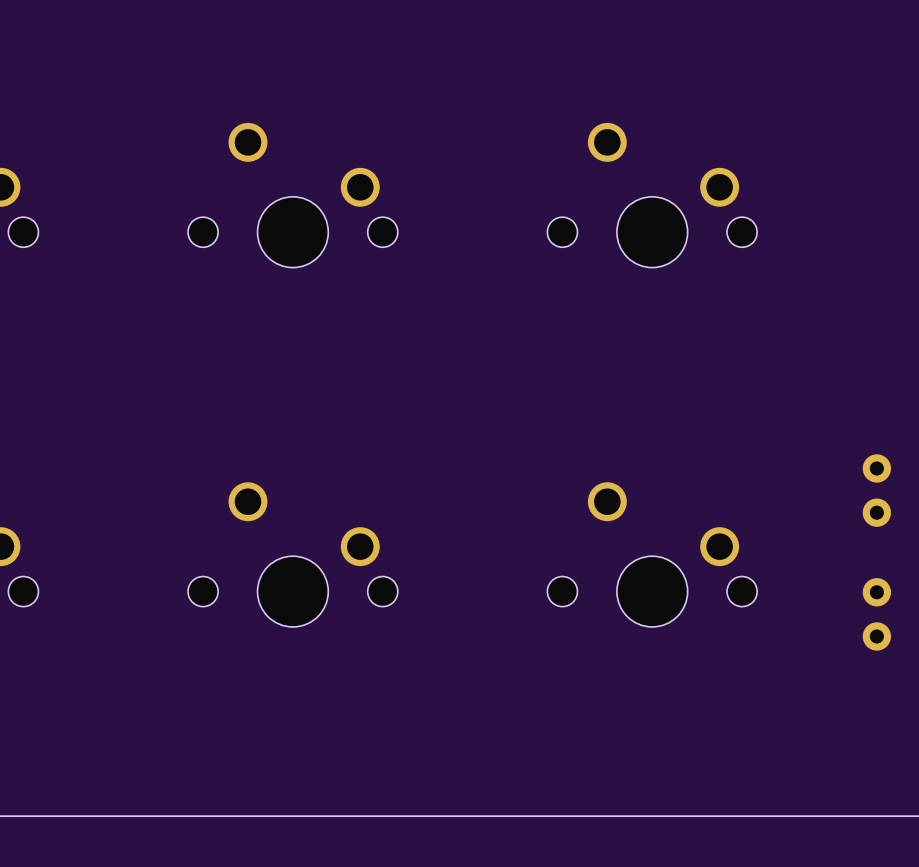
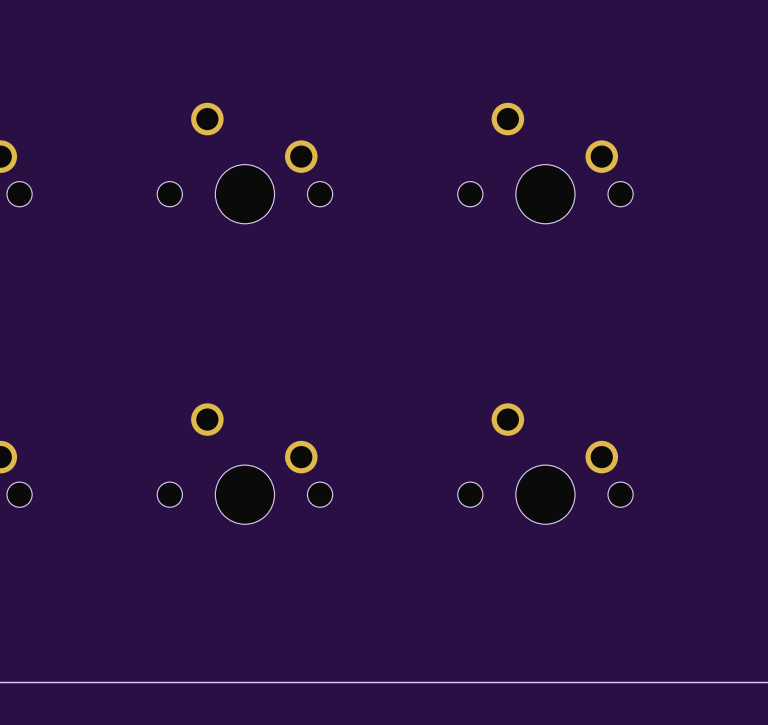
part: (876, 490) -> none
part: (876, 614) -> none

